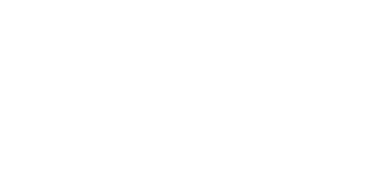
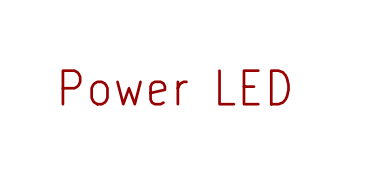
text: none -> Power LED (175, 87)

